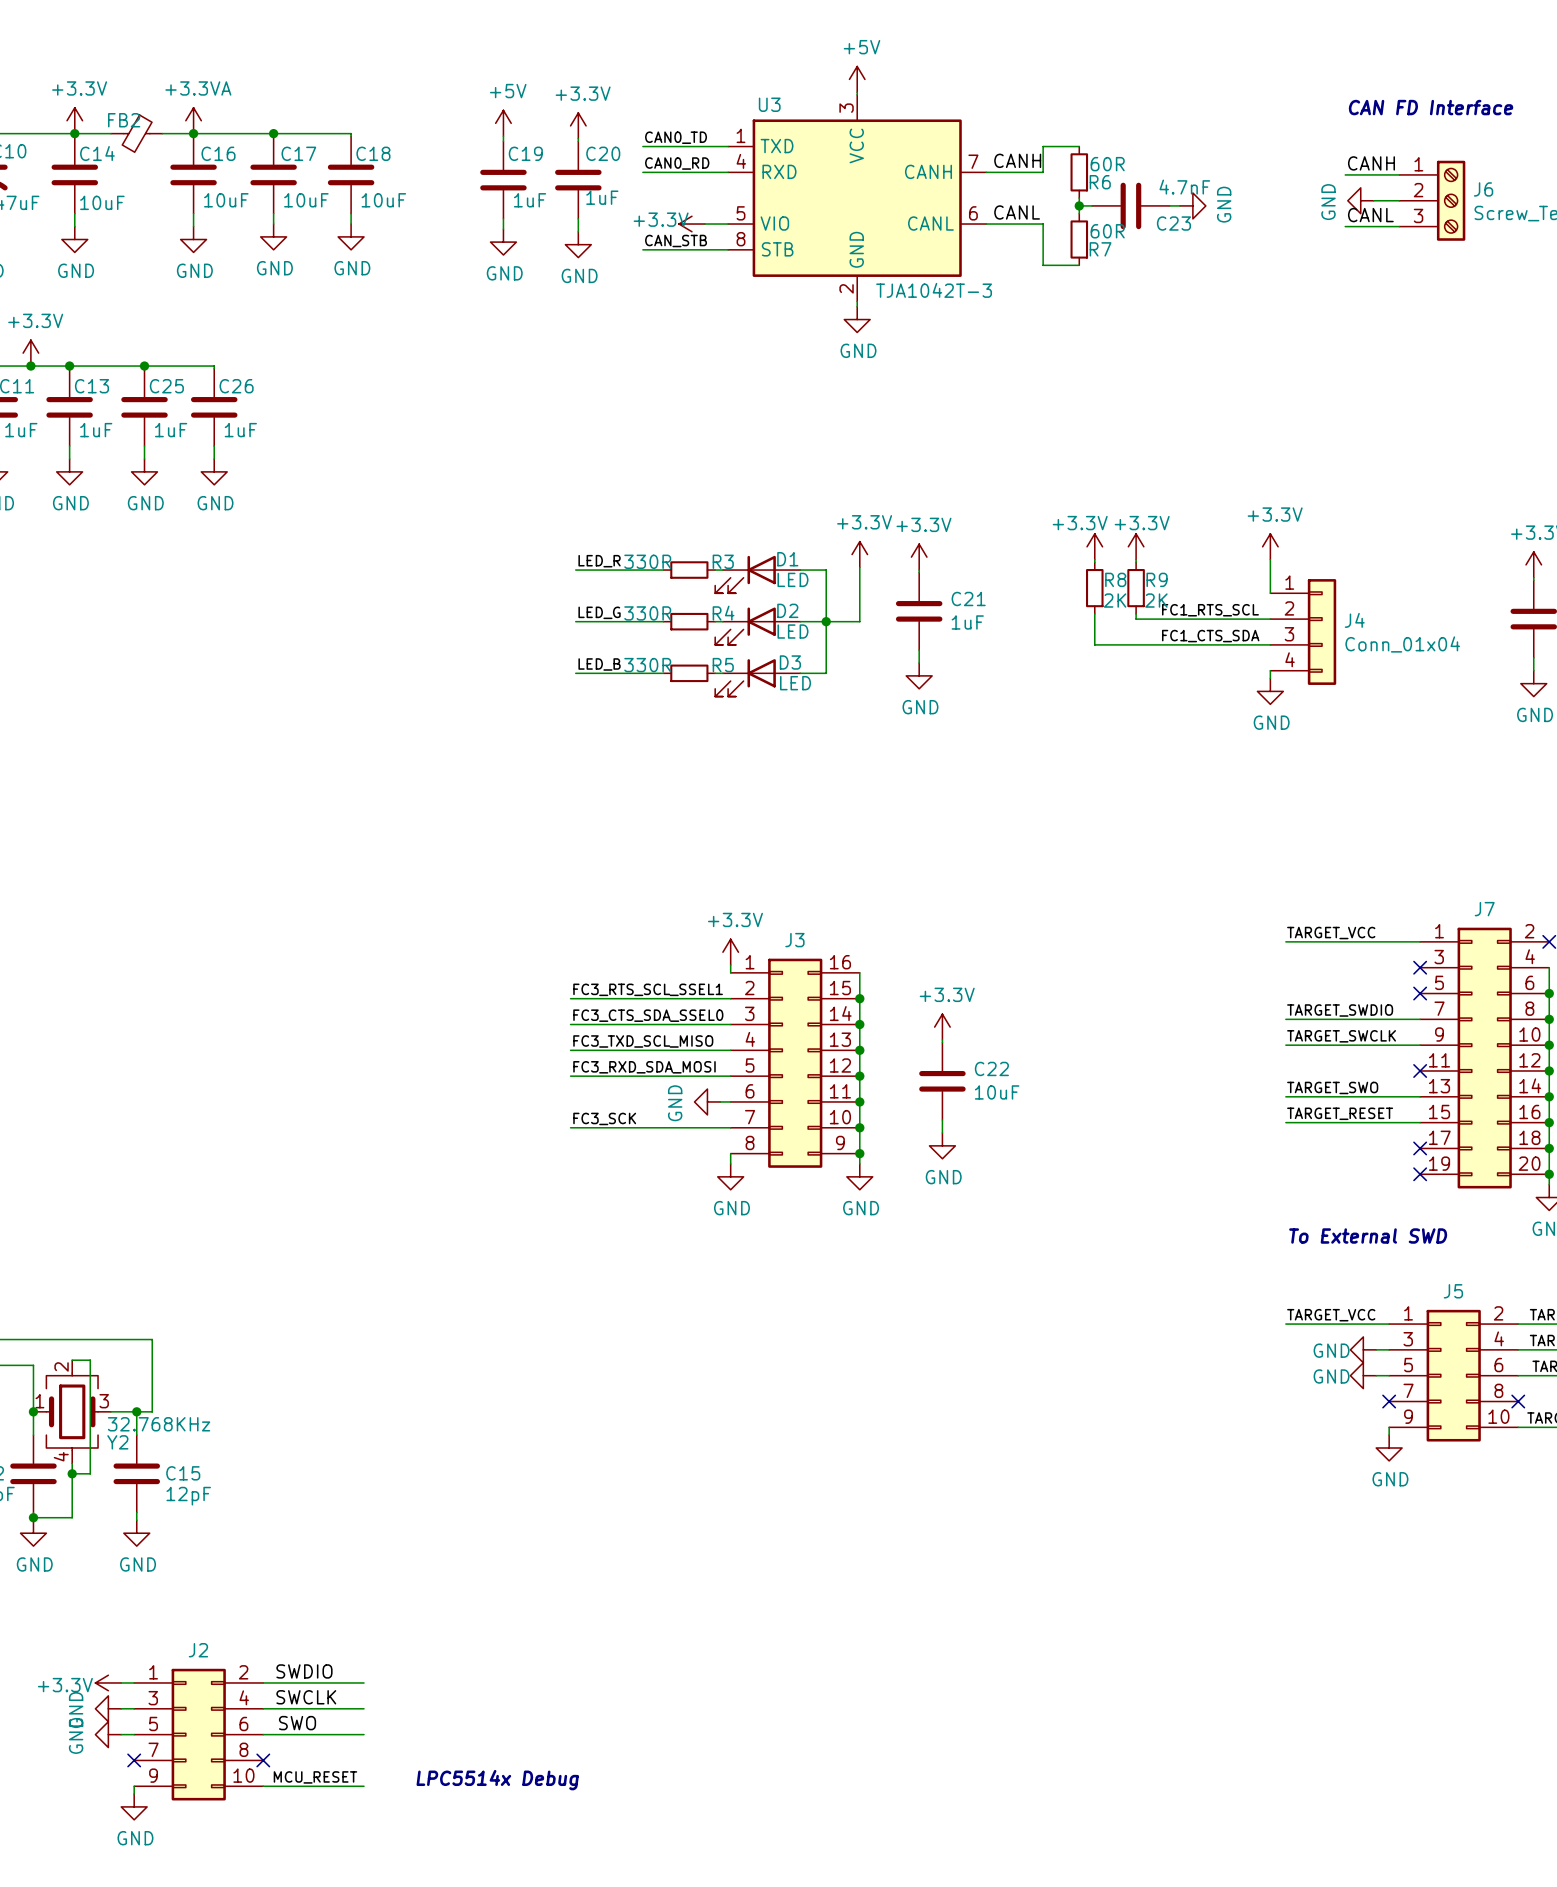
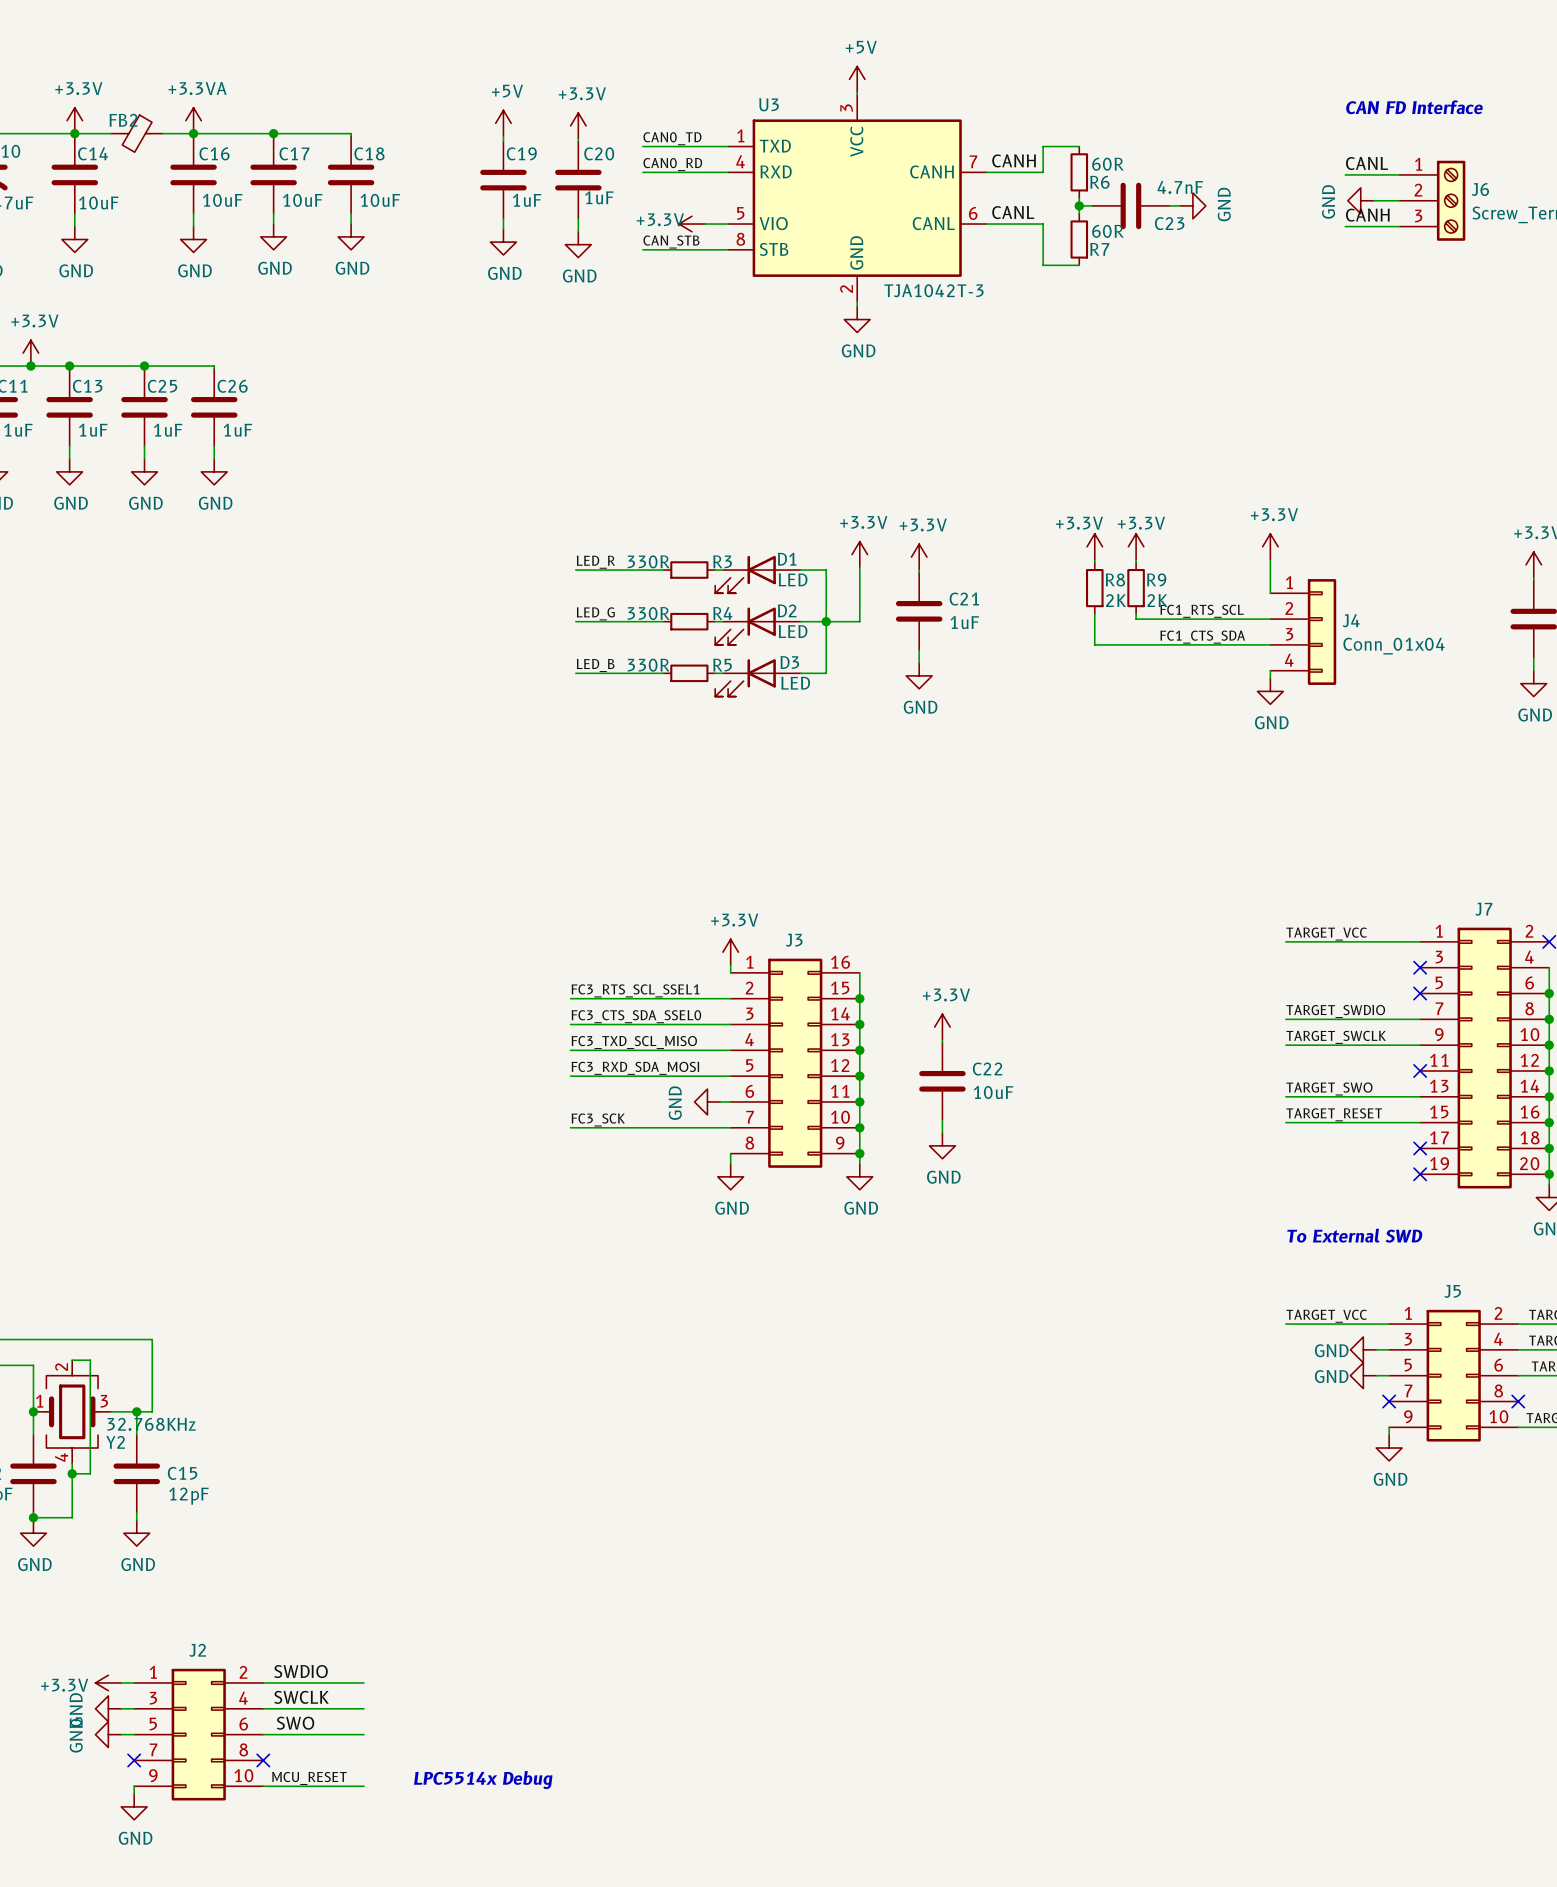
label: CANH (1371, 163) -> CANL (1367, 163)
label: CANL (1370, 215) -> CANH (1367, 215)

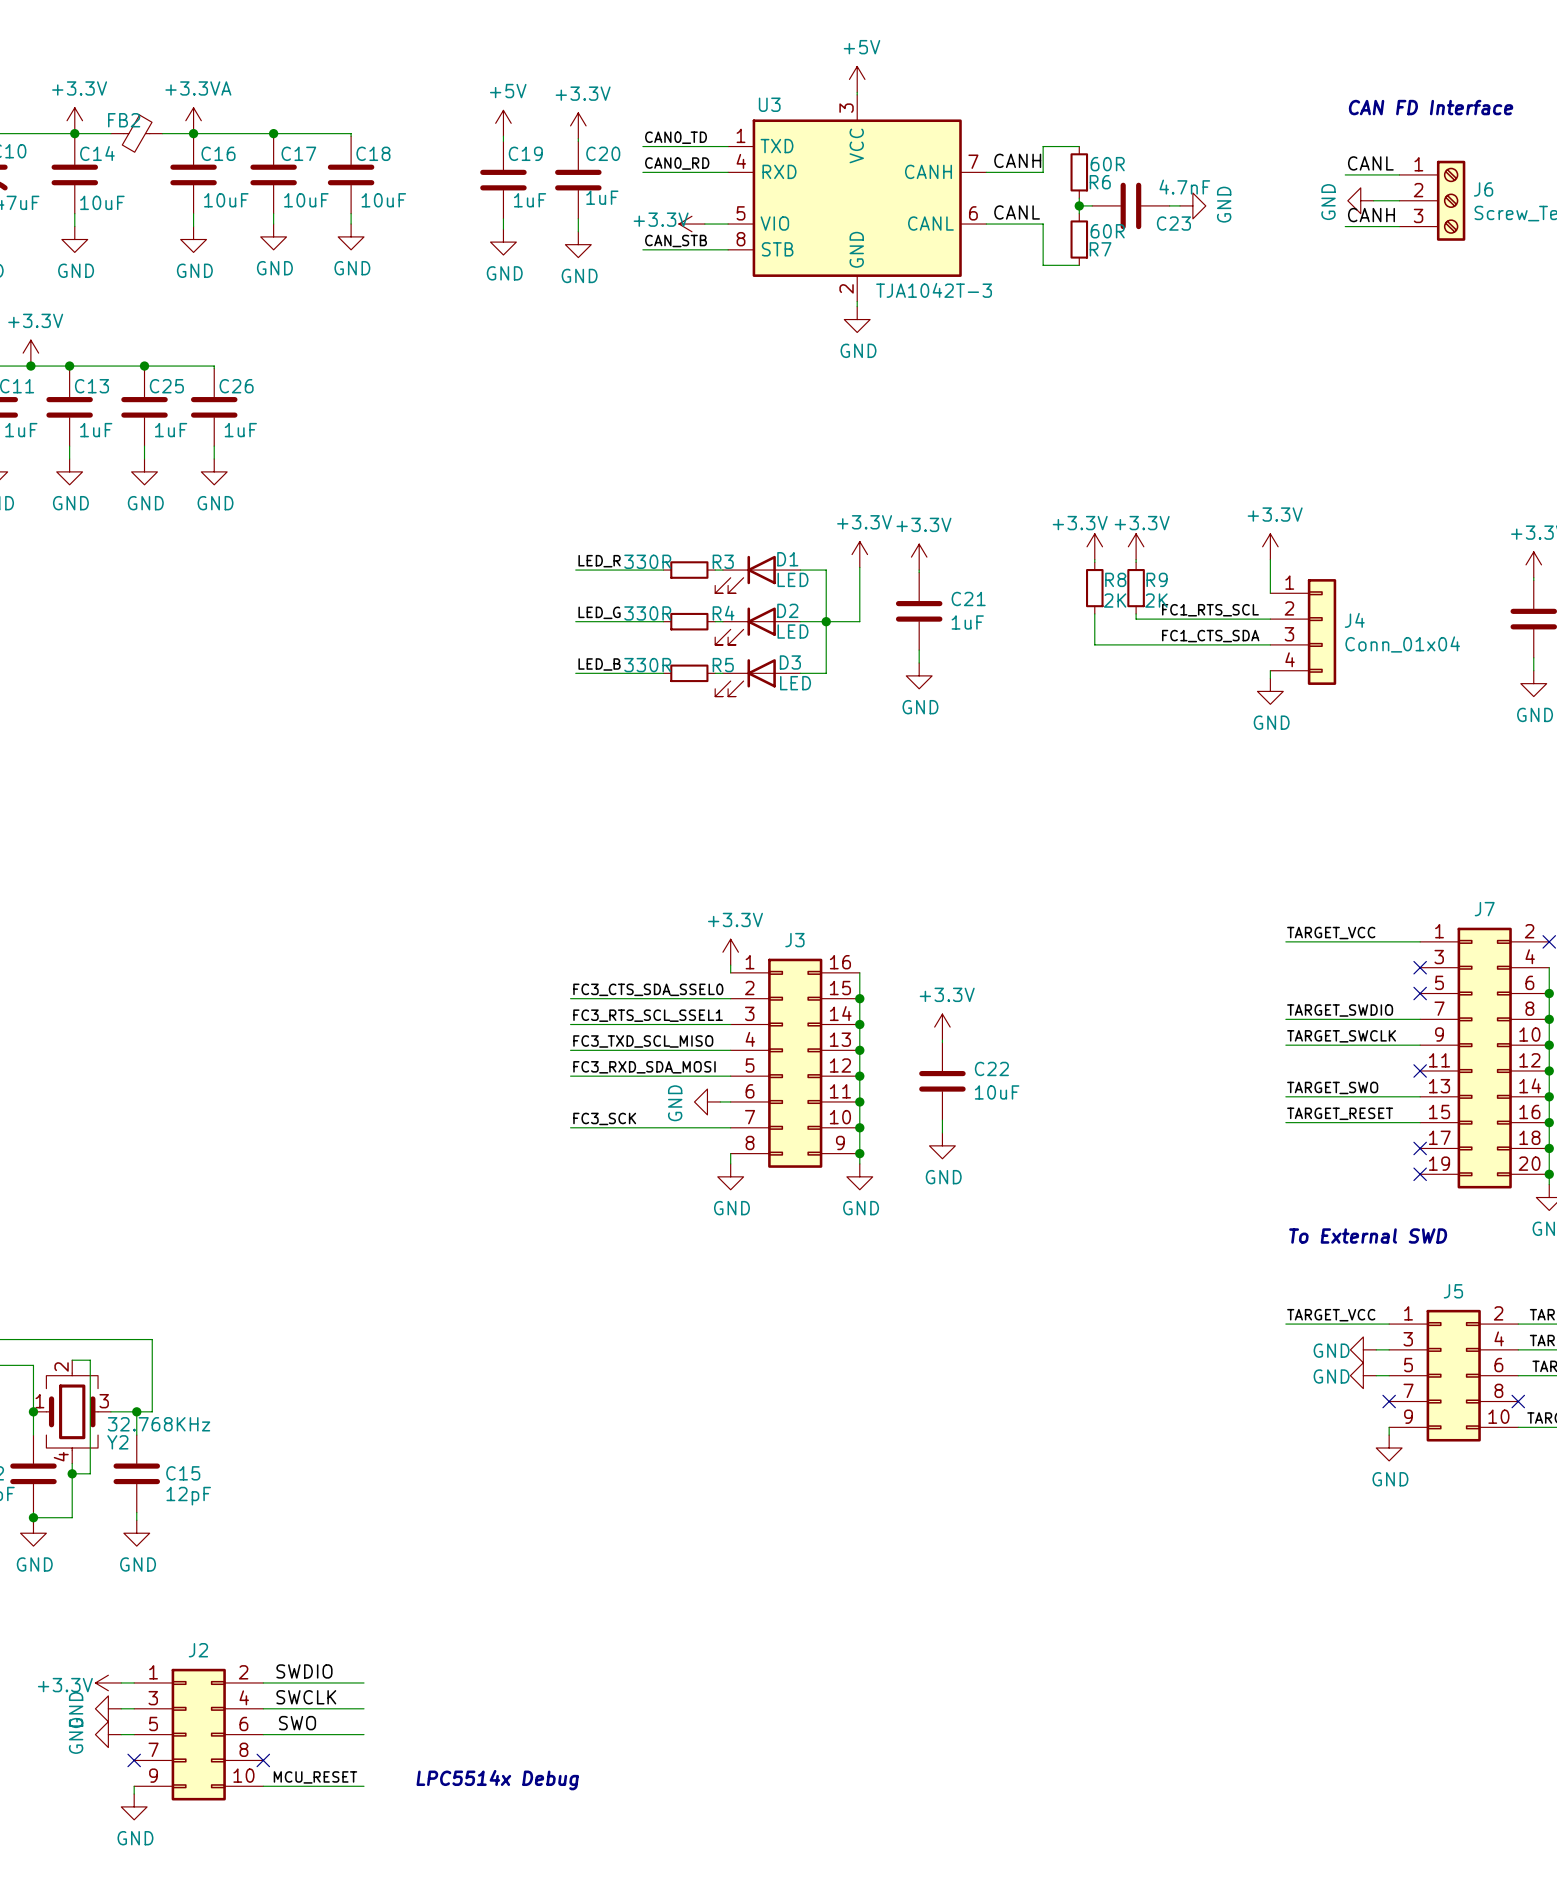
label: FC3_RTS_SCL_SSEL1 (635, 990) -> FC3_CTS_SDA_SSEL0 (648, 989)
label: FC3_CTS_SDA_SSEL0 (636, 1016) -> FC3_RTS_SCL_SSEL1 (648, 1015)

